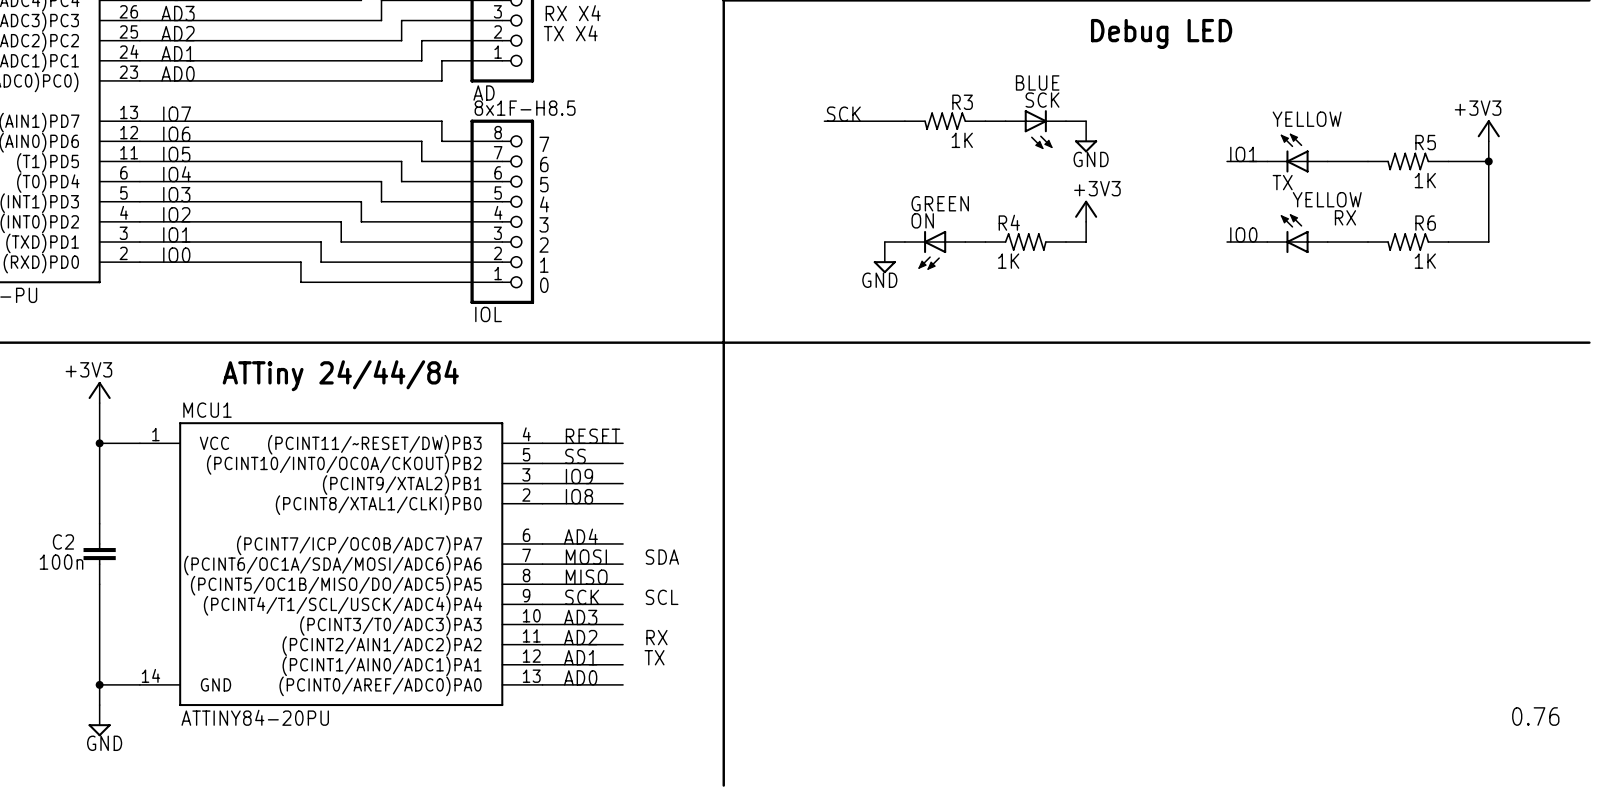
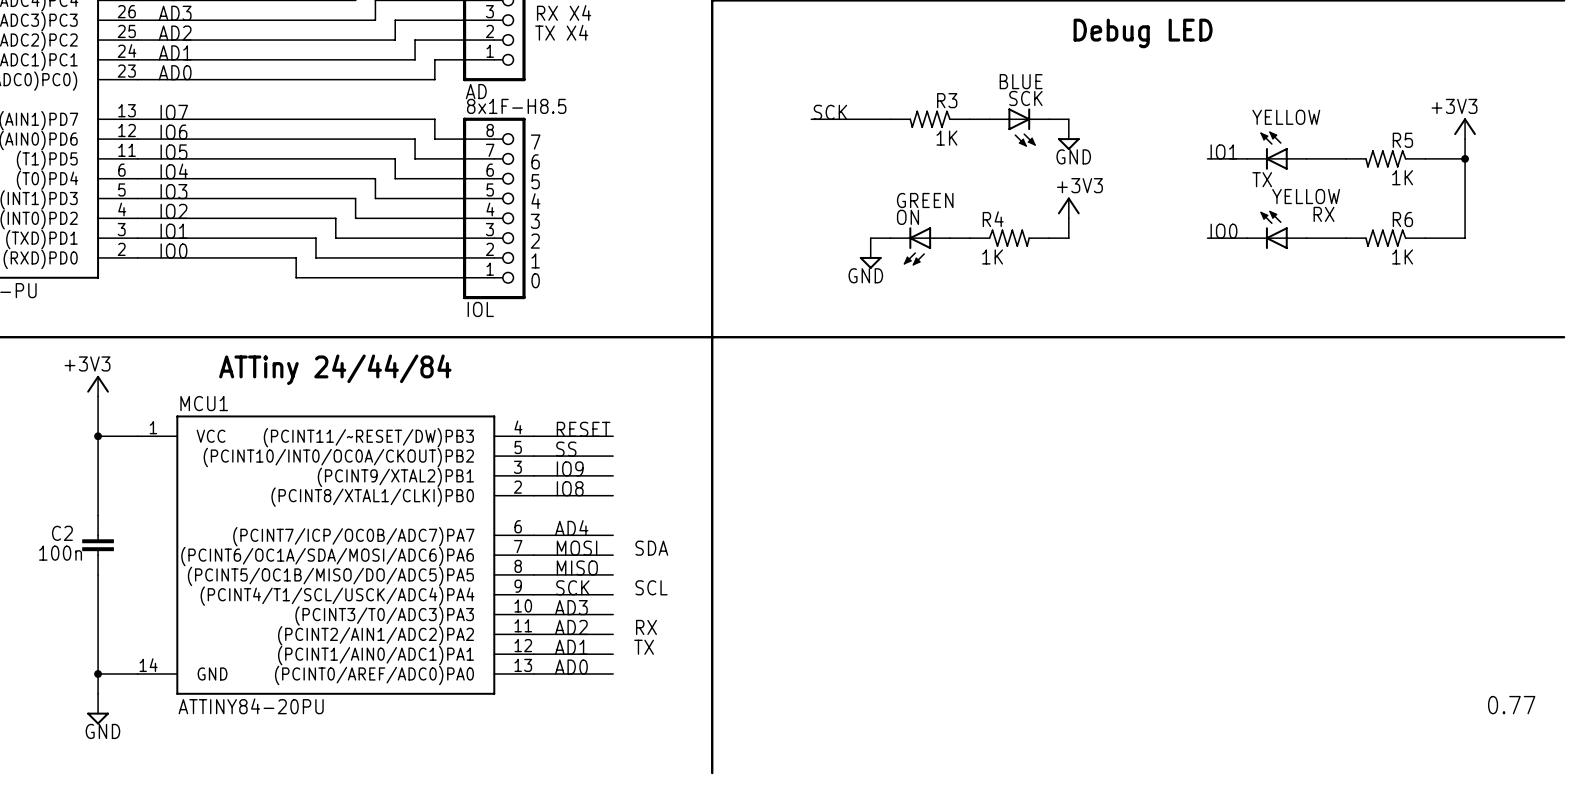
text: 0.76 (1535, 716) -> 0.77 (1511, 705)

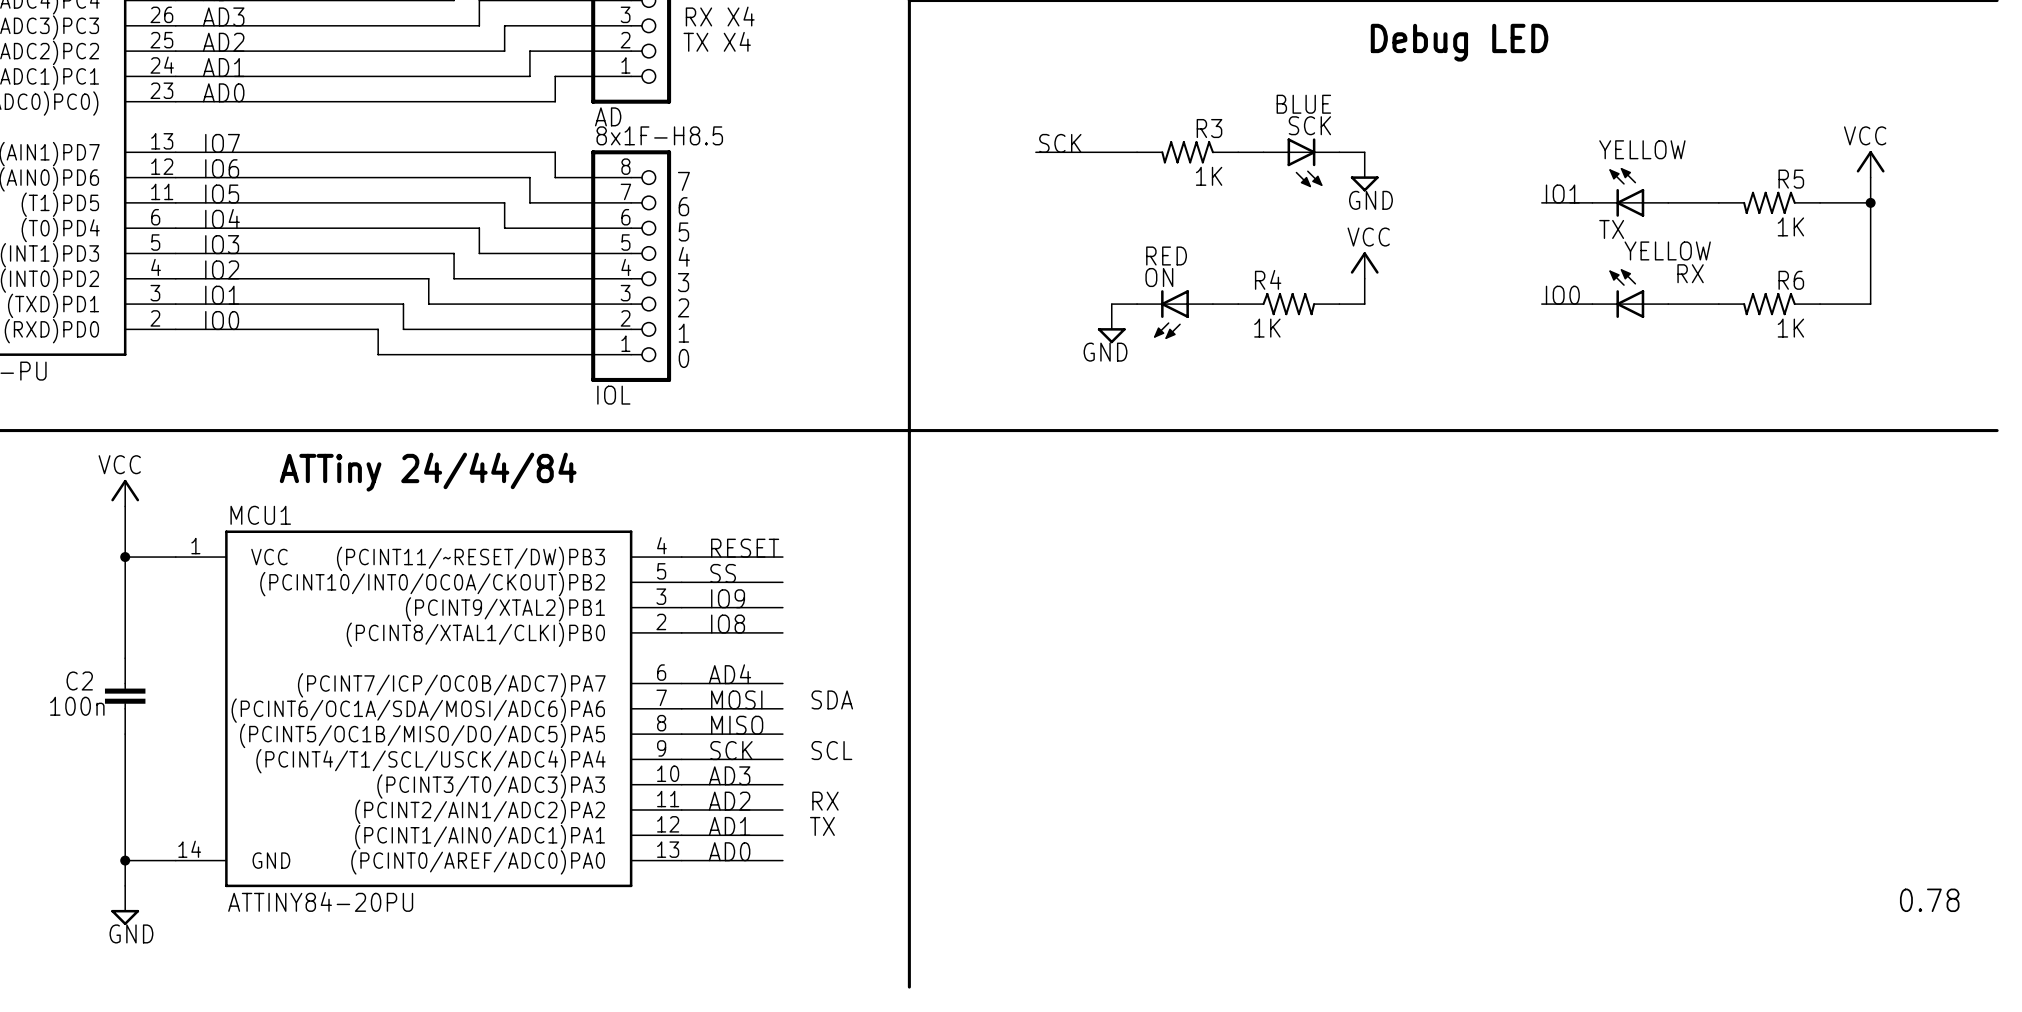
power symbol: +3V3 (1465, 128) -> VCC (1870, 164)
ON value: GREEN (925, 200) -> RED (1166, 256)
power symbol: +3V3 (1068, 207) -> VCC (1364, 265)
power symbol: +3V3 (98, 386) -> VCC (125, 493)
text: 0.77 (1511, 705) -> 0.78 (1929, 900)

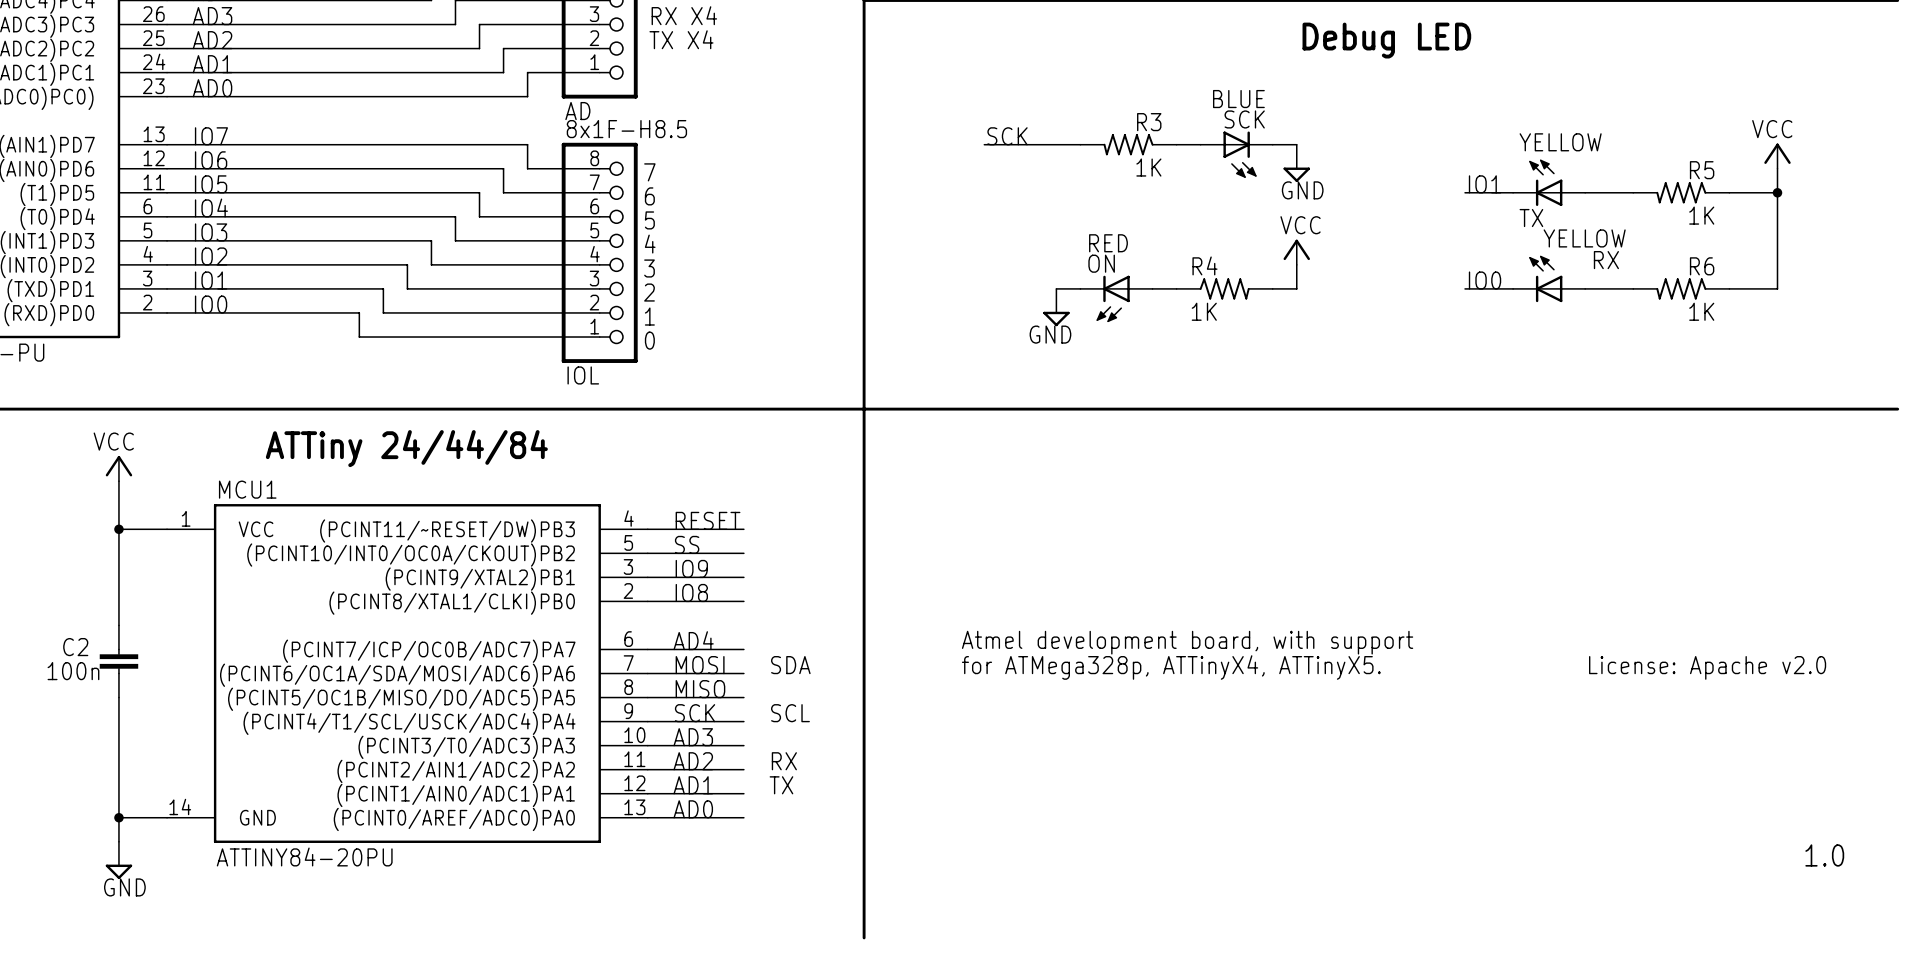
text: none -> Atmel development board, with support (1187, 642)
text: none -> for ATMega328p, ATTinyX4, ATTinyX5. (1171, 667)
text: none -> License: Apache v2.0 (1707, 667)
text: 0.78 (1929, 900) -> 1.0 (1824, 855)

